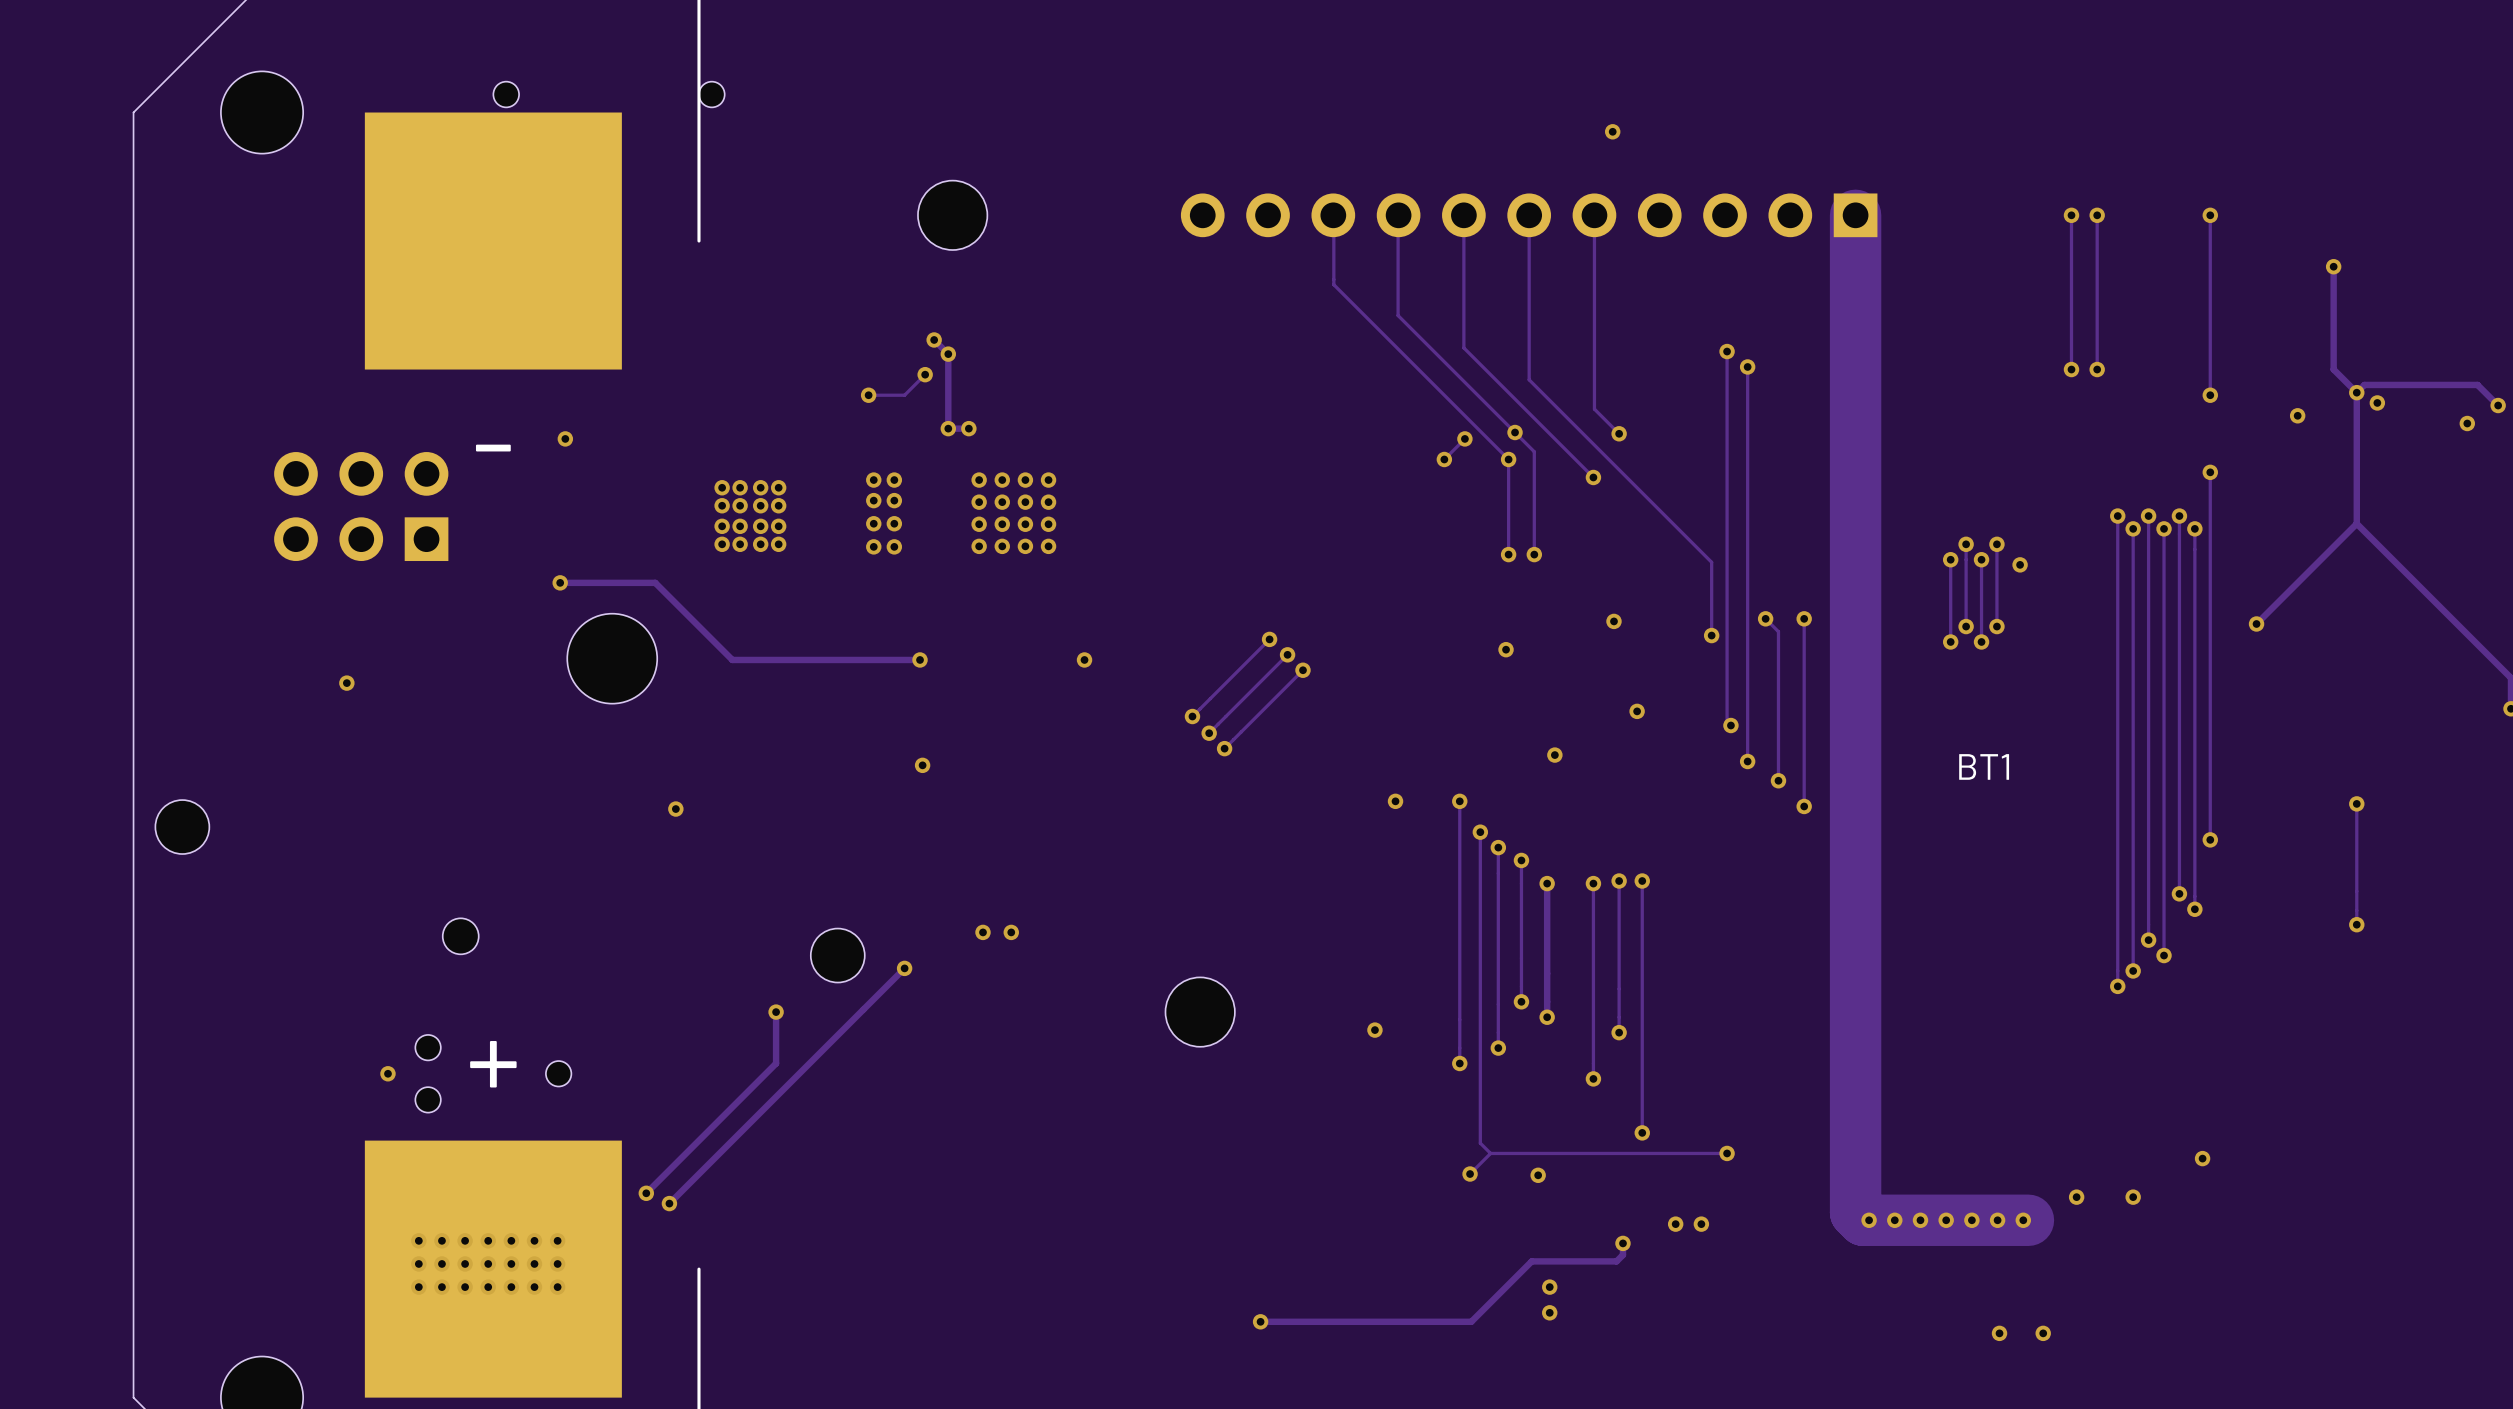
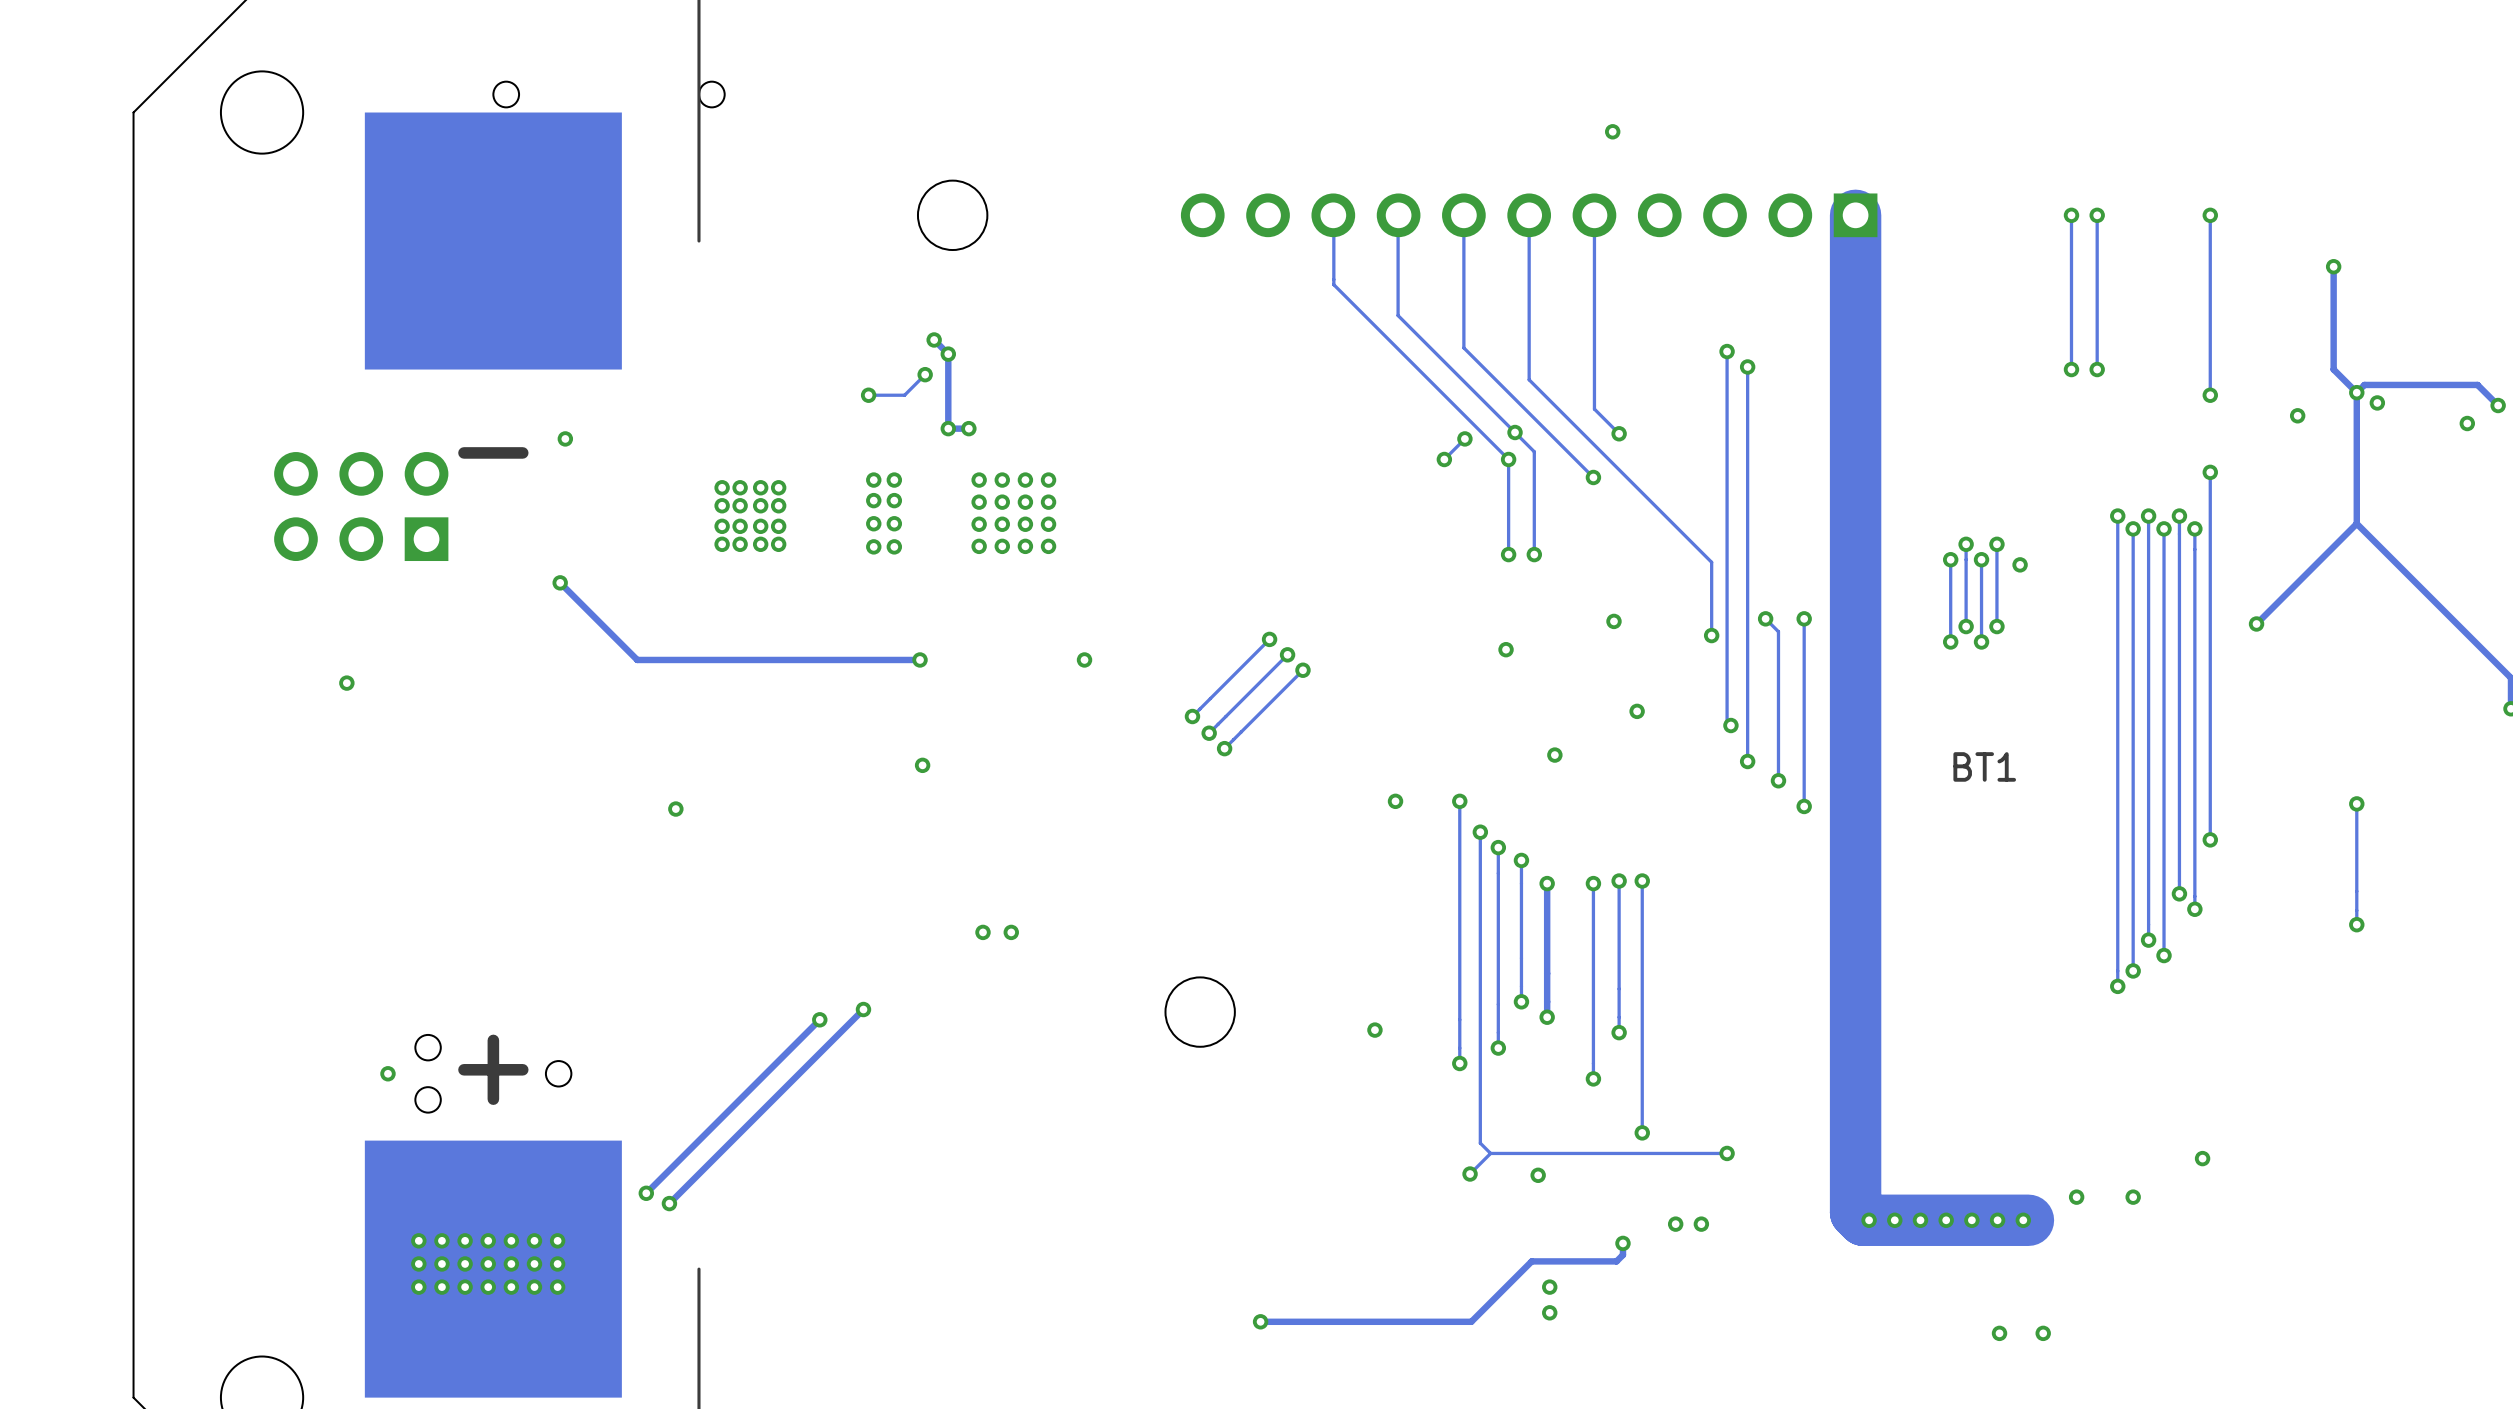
track: (560, 582) (655, 582) (732, 659) -> (560, 582) (637, 659) (732, 659)
part: (612, 658) -> none
part: (182, 827) -> none
part: (460, 936) -> none
part: (837, 955) -> none
track: (904, 968) (863, 1009) -> none
via: (904, 968) -> none
via: none -> (863, 1009)
track: (776, 1012) (776, 1063) -> (819, 1019) (776, 1063)
via: (776, 1012) -> none
via: none -> (819, 1019)

